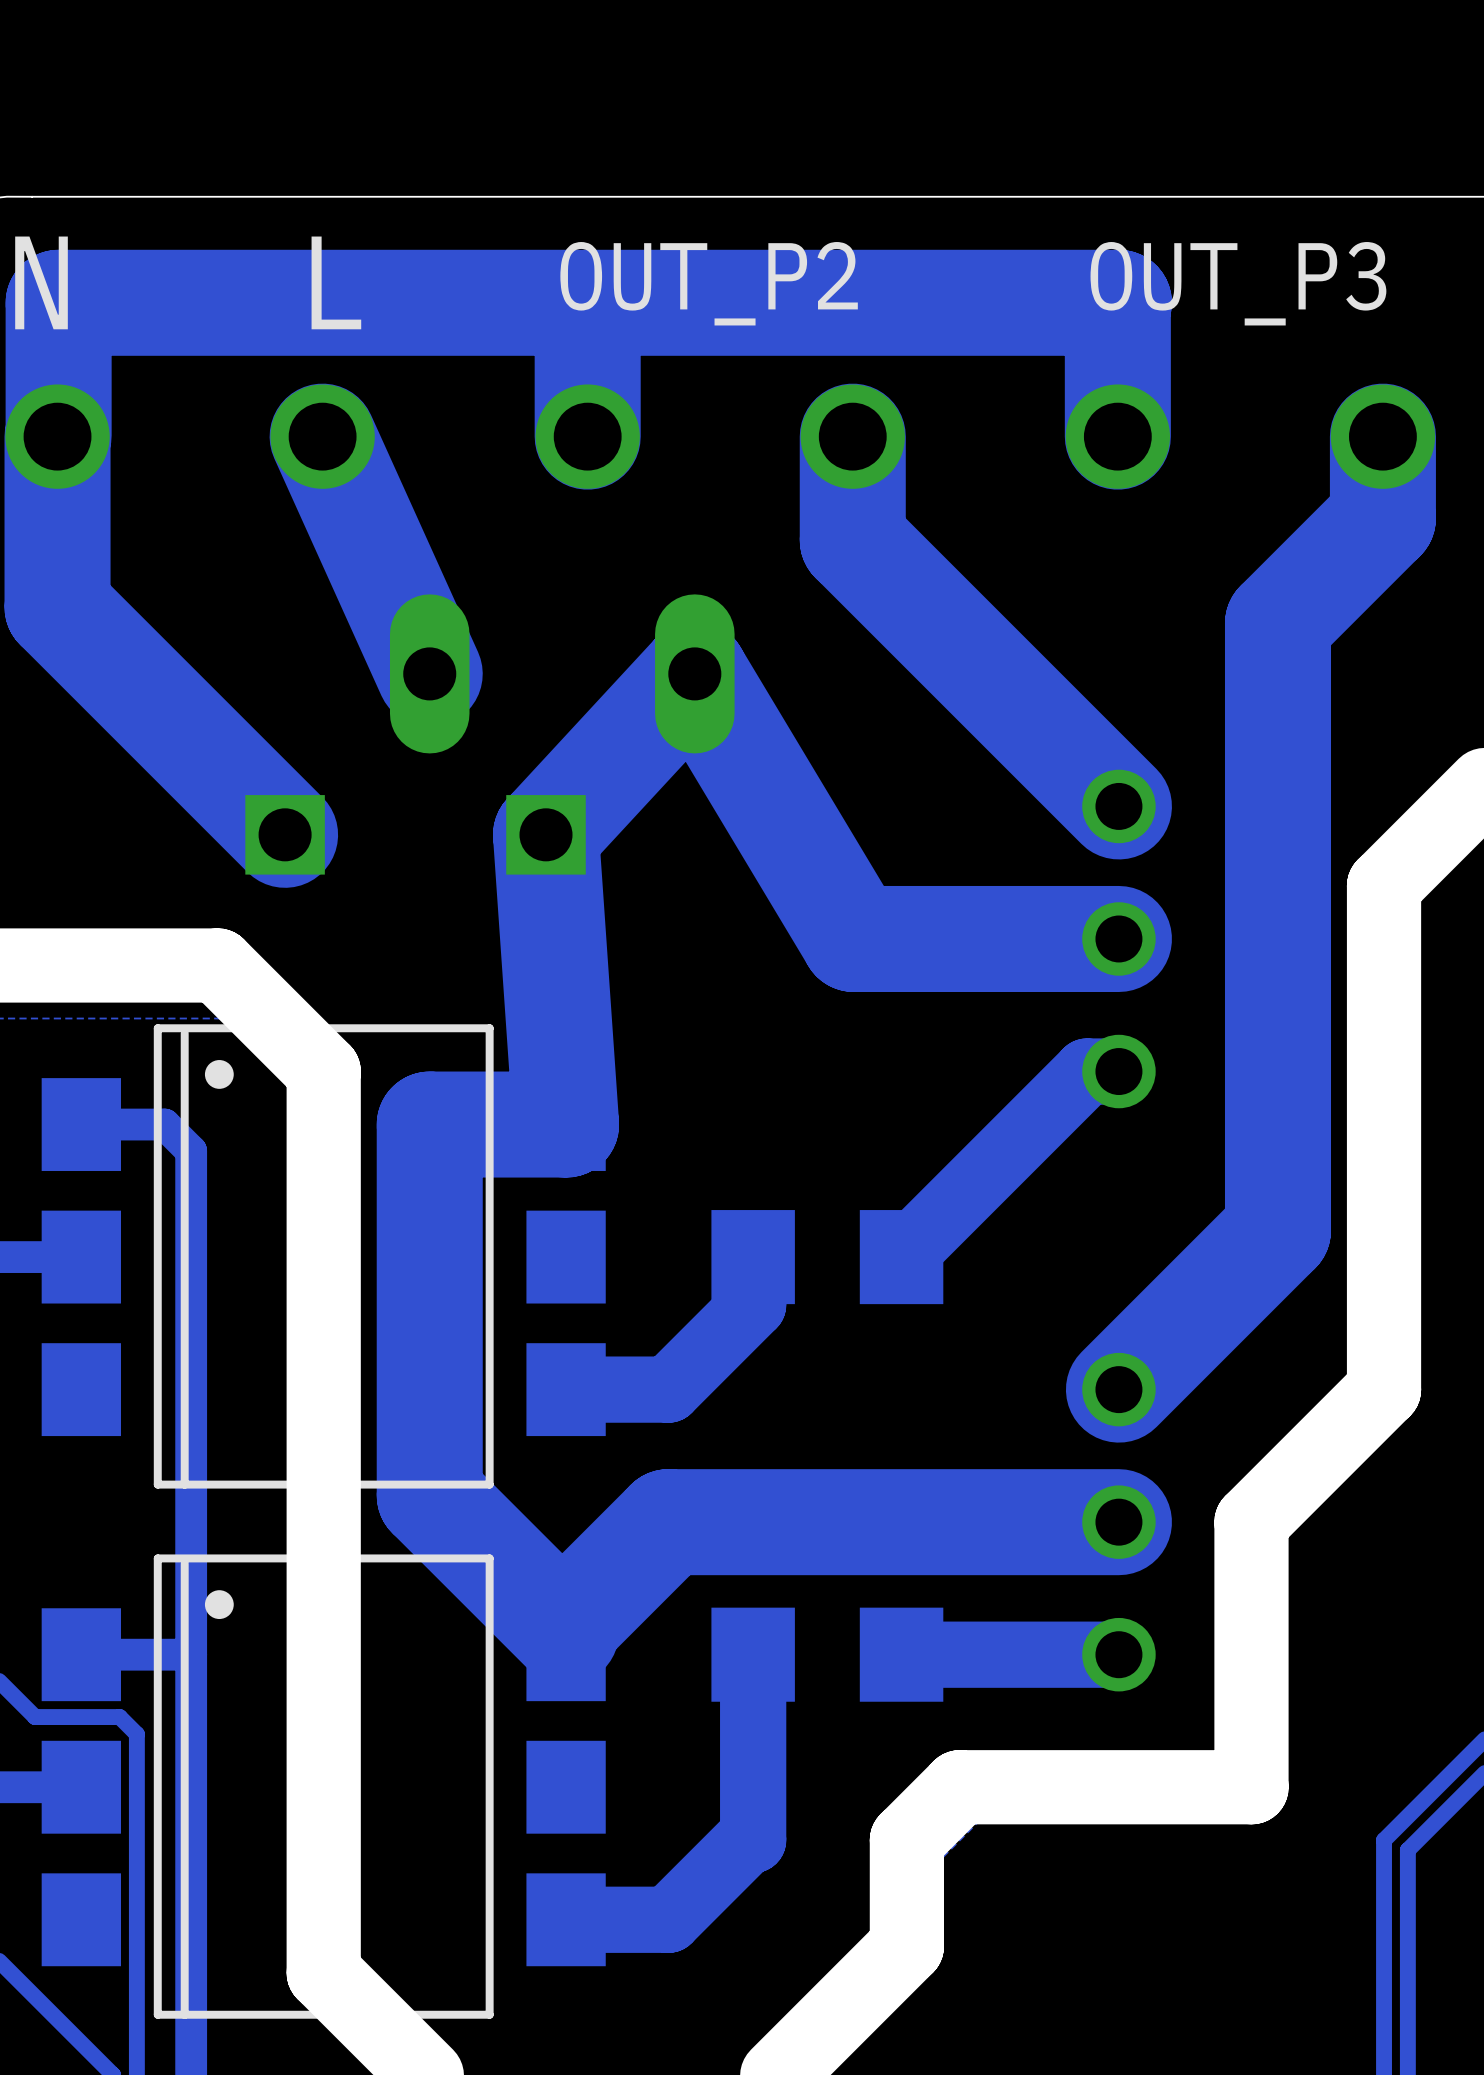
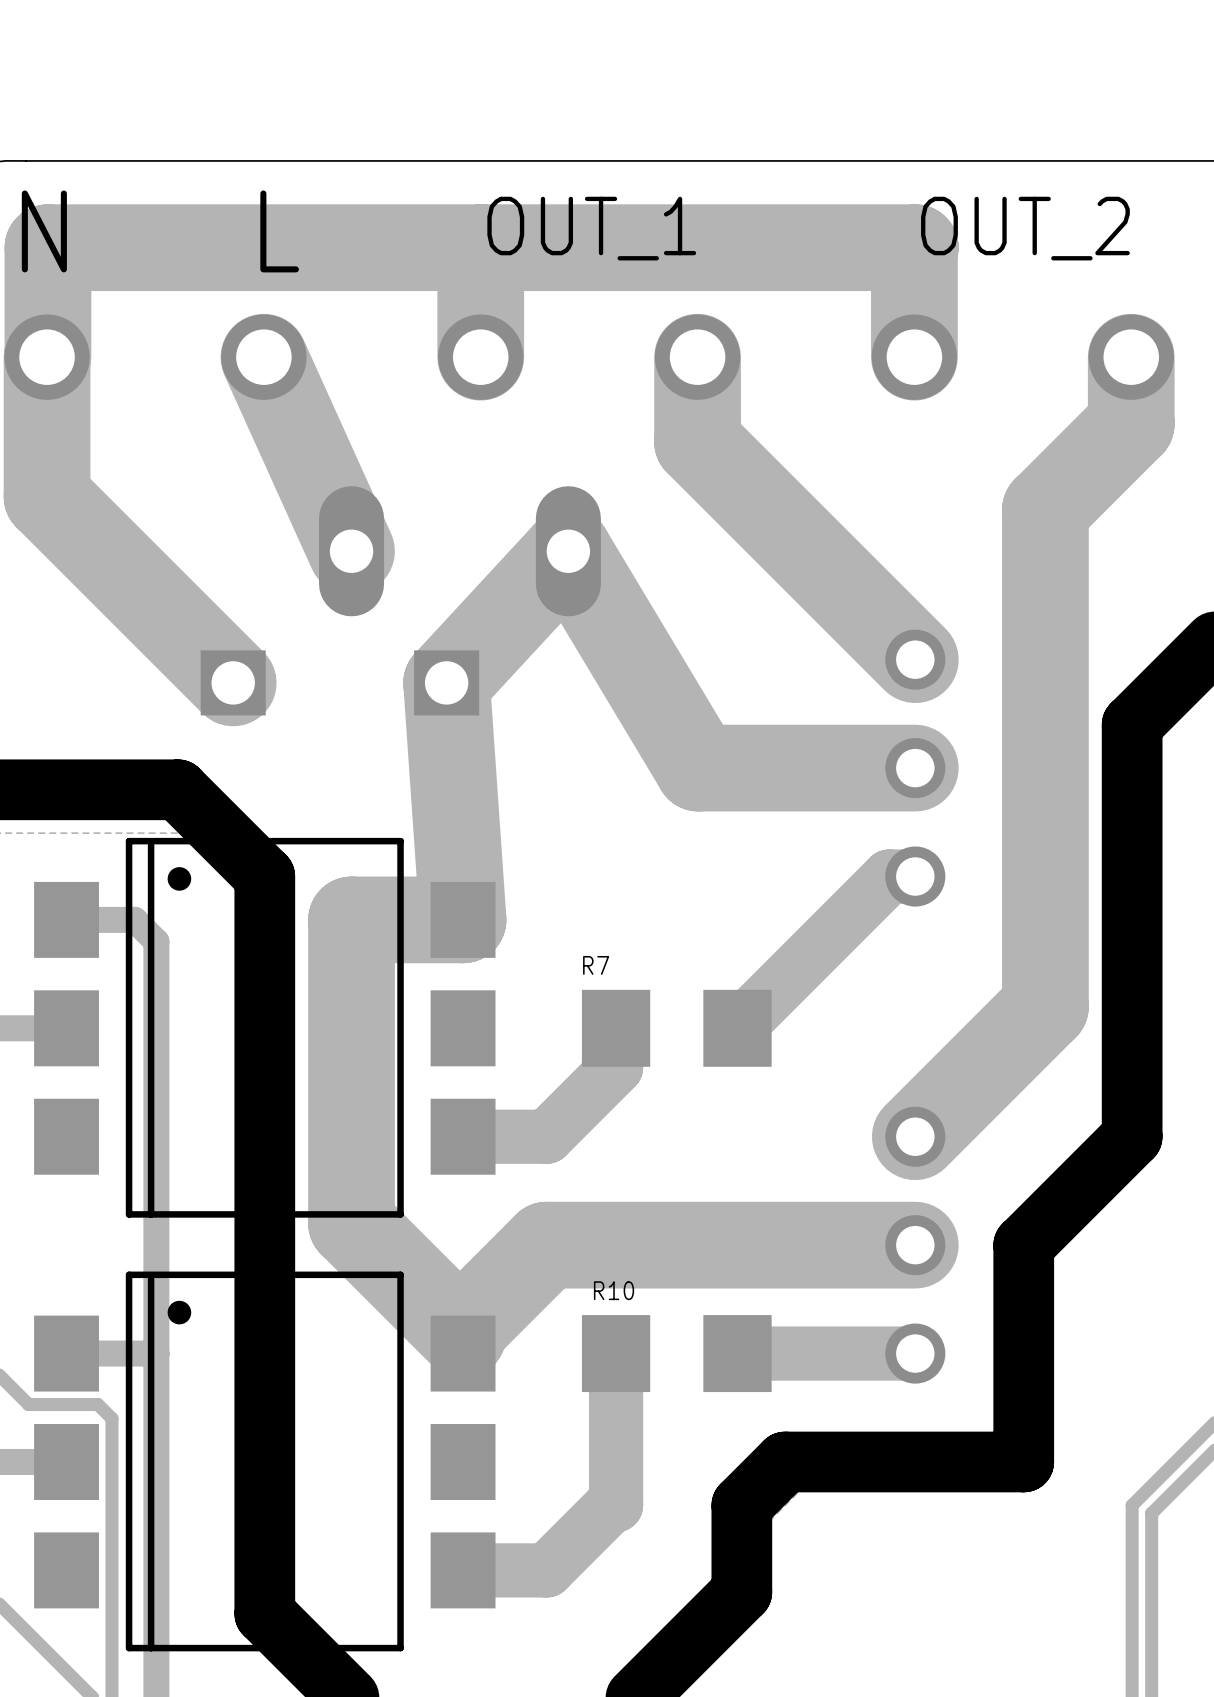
OUT_P2 name: OUT_P2 (709, 283) -> OUT_1 (591, 228)
OUT_P3 name: OUT_P3 (1238, 283) -> OUT_2 (1025, 228)
R7 name: none -> R7 (596, 965)
R10 name: none -> R10 (614, 1290)

